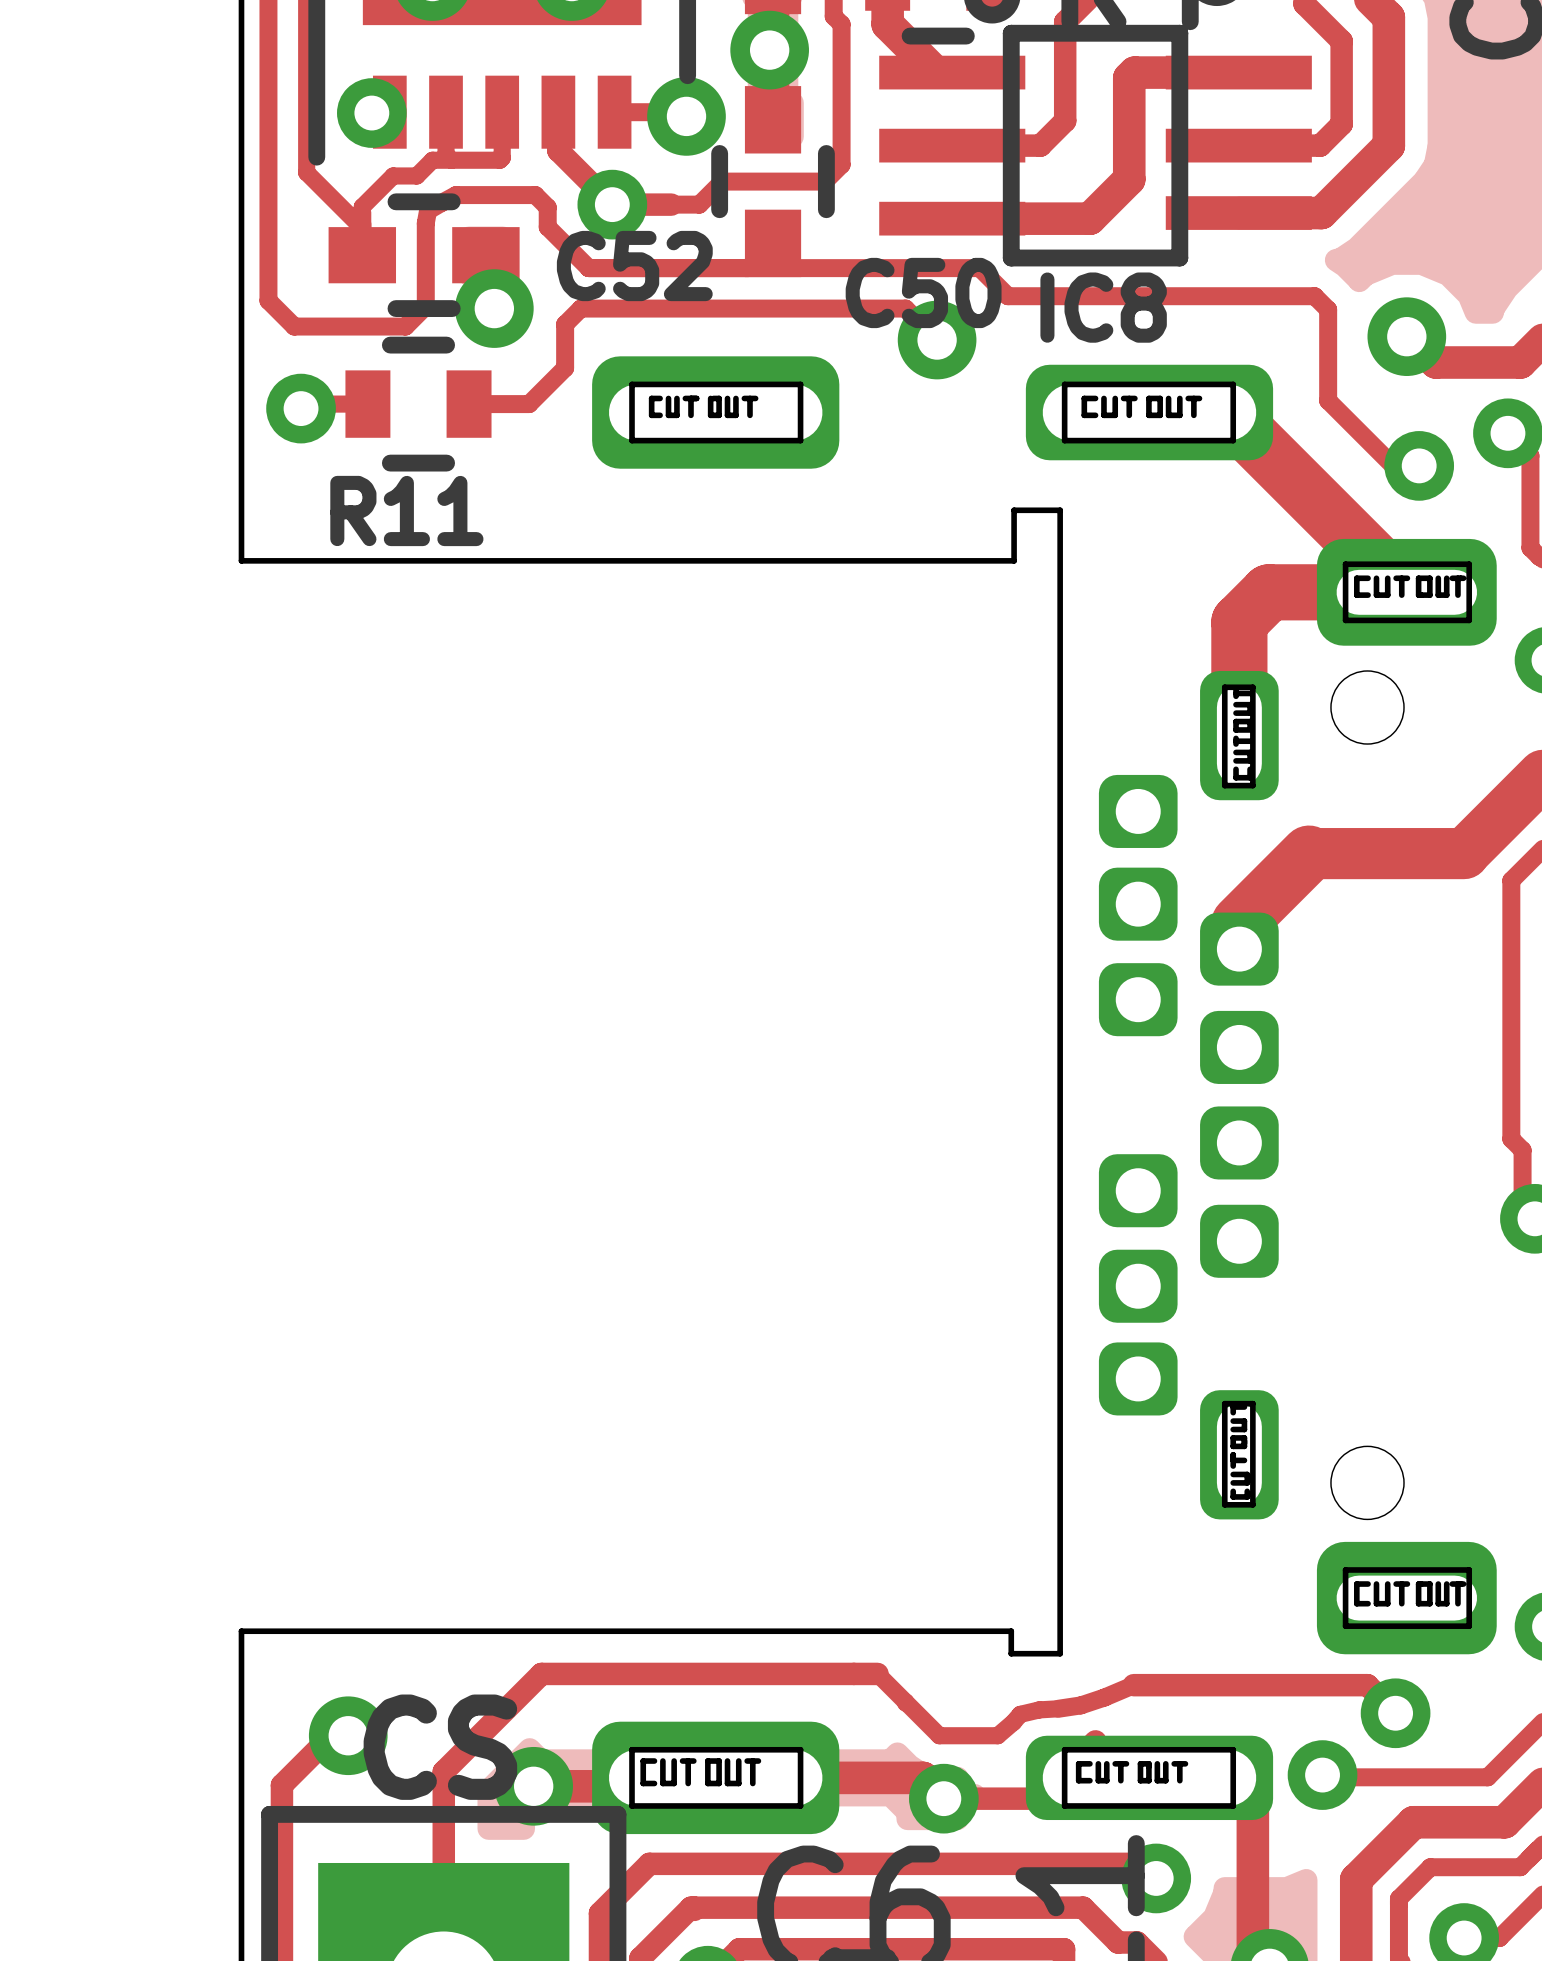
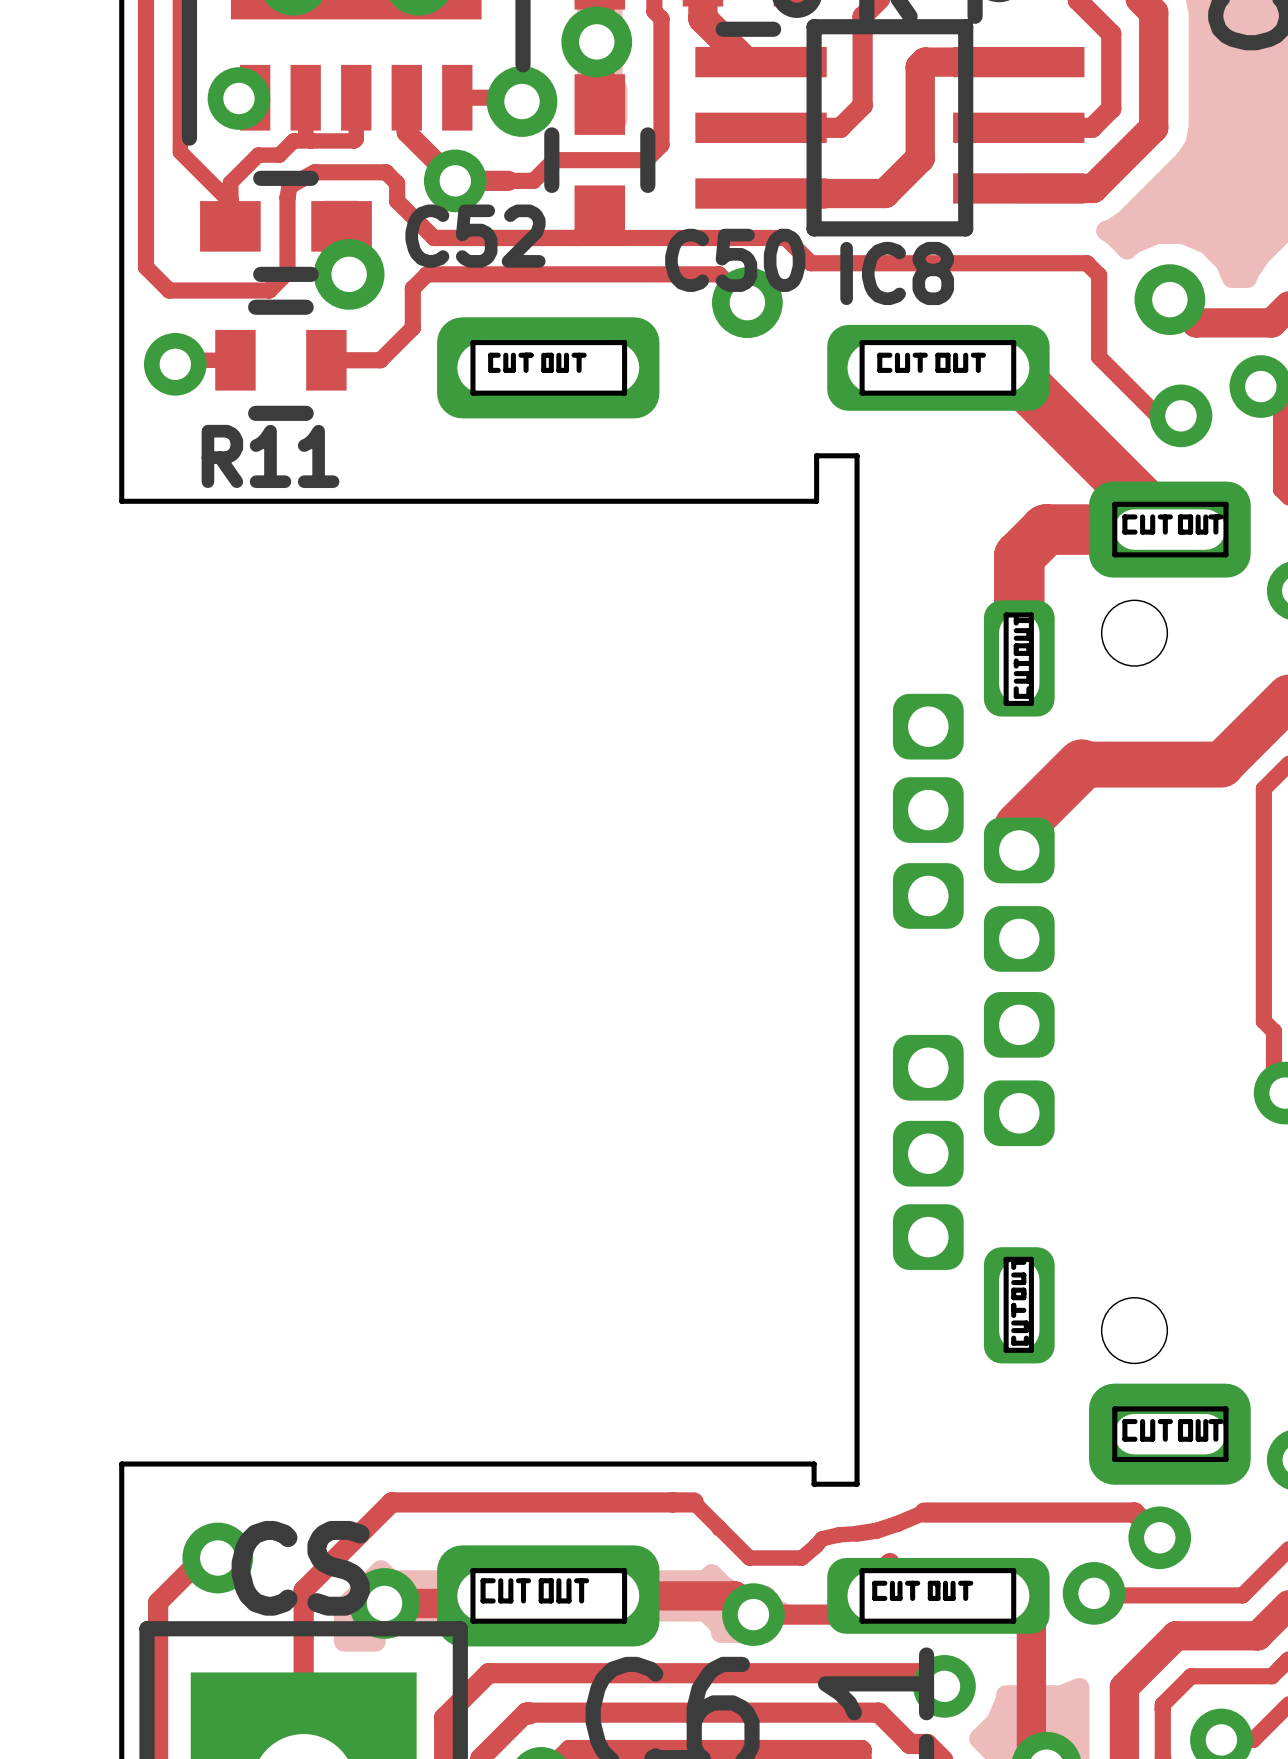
part footprint: [592, 356, 1497, 1835] -> [437, 317, 1251, 1647]

